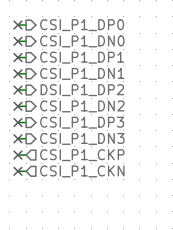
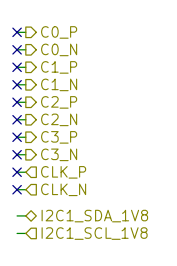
hierarchical label: CSI_P1_DP0 (82, 25) -> C0_P (59, 32)
hierarchical label: CSI_P1_DN0 (82, 41) -> C0_N (59, 49)
hierarchical label: CSI_P1_DP1 (82, 57) -> C1_P (59, 67)
hierarchical label: CSI_P1_DN1 (82, 73) -> C1_N (59, 84)
hierarchical label: DSI_P1_DP2 (82, 90) -> C2_P (59, 102)
hierarchical label: CSI_P1_DN2 (82, 106) -> C2_N (59, 119)
hierarchical label: CSI_P1_DP3 (82, 122) -> C3_P (59, 137)
hierarchical label: CSI_P1_DN3 (82, 138) -> C3_N (59, 154)
hierarchical label: CSI_P1_CKP (82, 155) -> CLK_P (63, 172)
hierarchical label: CSI_P1_CKN (82, 171) -> CLK_N (63, 189)
wire: none -> (17, 215) (25, 215)
hierarchical label: none -> I2C1_SDA_1V8 (94, 216)
wire: none -> (17, 233) (25, 233)
hierarchical label: none -> I2C1_SCL_1V8 (94, 233)

